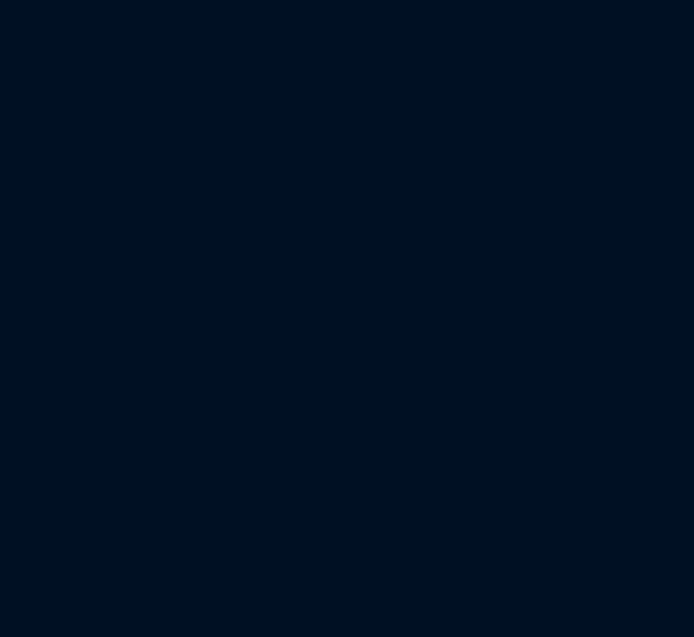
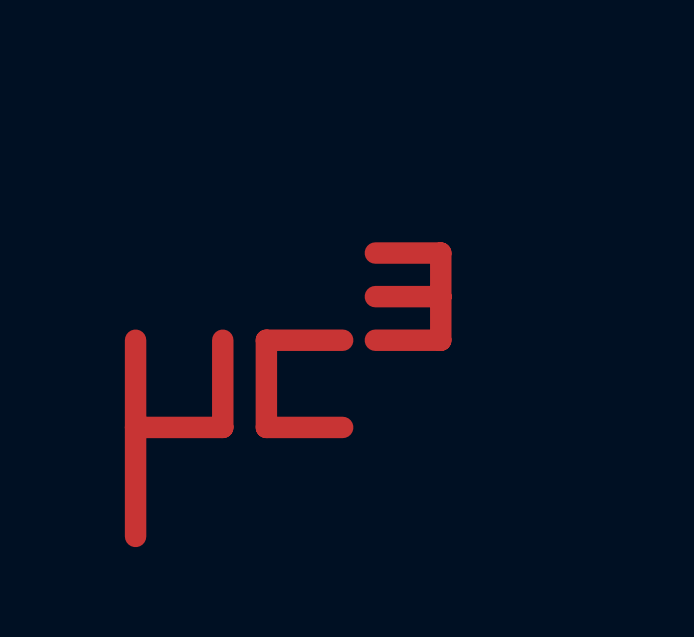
top track: none -> (375, 253) (440, 253) (440, 340) (375, 340)
top track: none -> (375, 296) (440, 296)
top track: none -> (135, 340) (135, 536)
top track: none -> (222, 340) (222, 427) (135, 427)
top track: none -> (342, 340) (266, 340) (266, 427) (342, 427)

